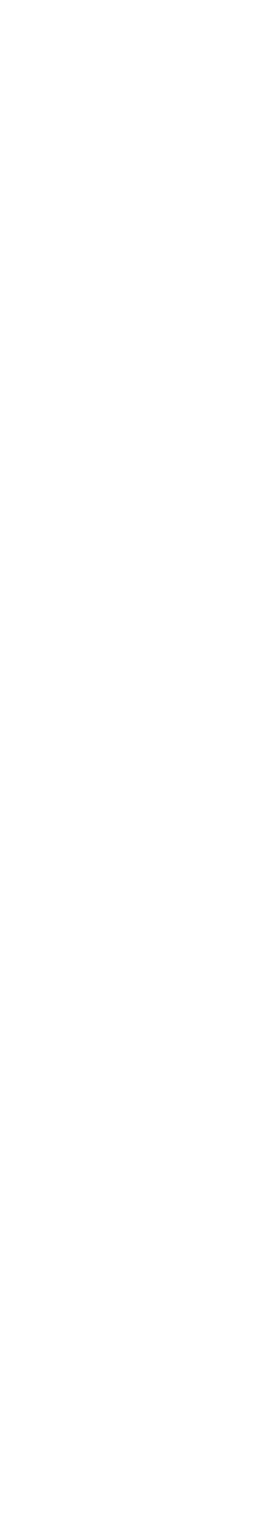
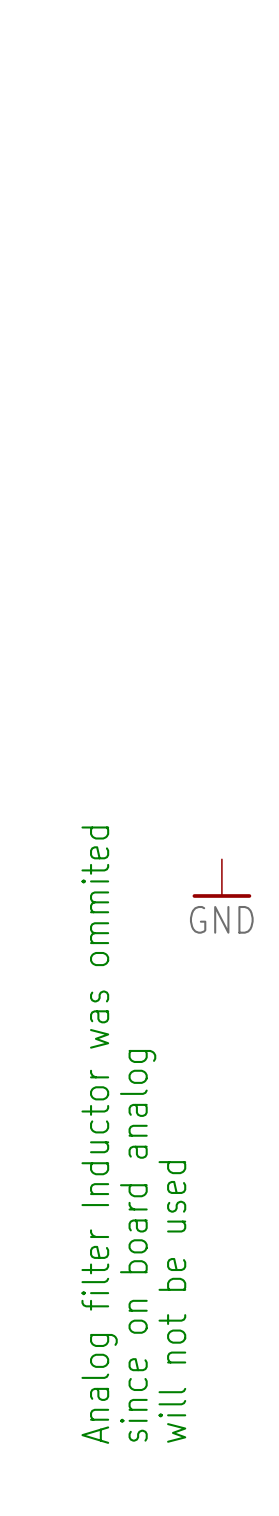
power symbol: none -> GND (221, 878)
text: none -> Analog filter Inductor was ommited (99, 1135)
text: none -> since on board analog (138, 1245)
text: none -> will not be used (172, 1301)

